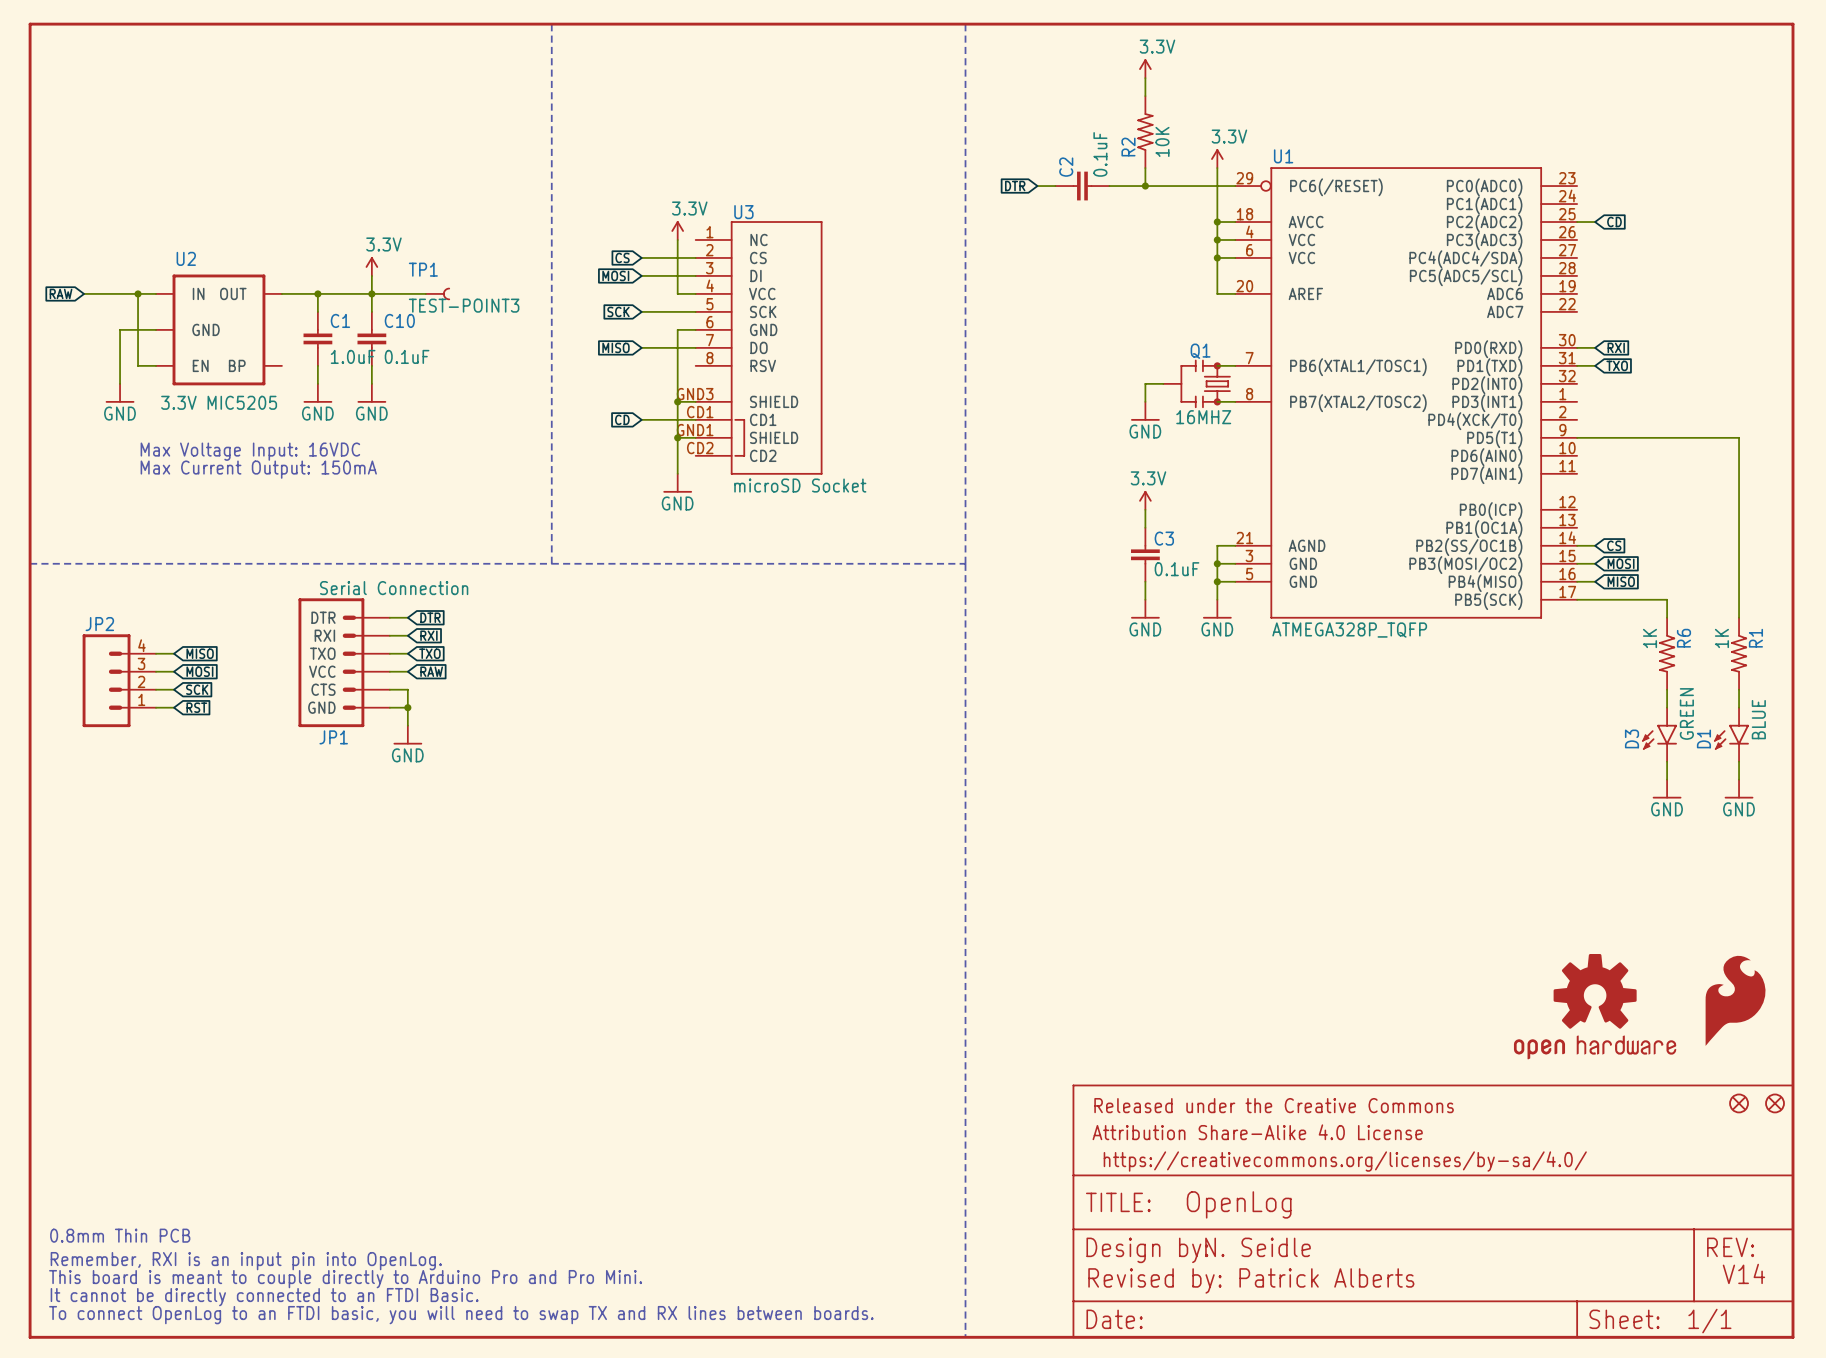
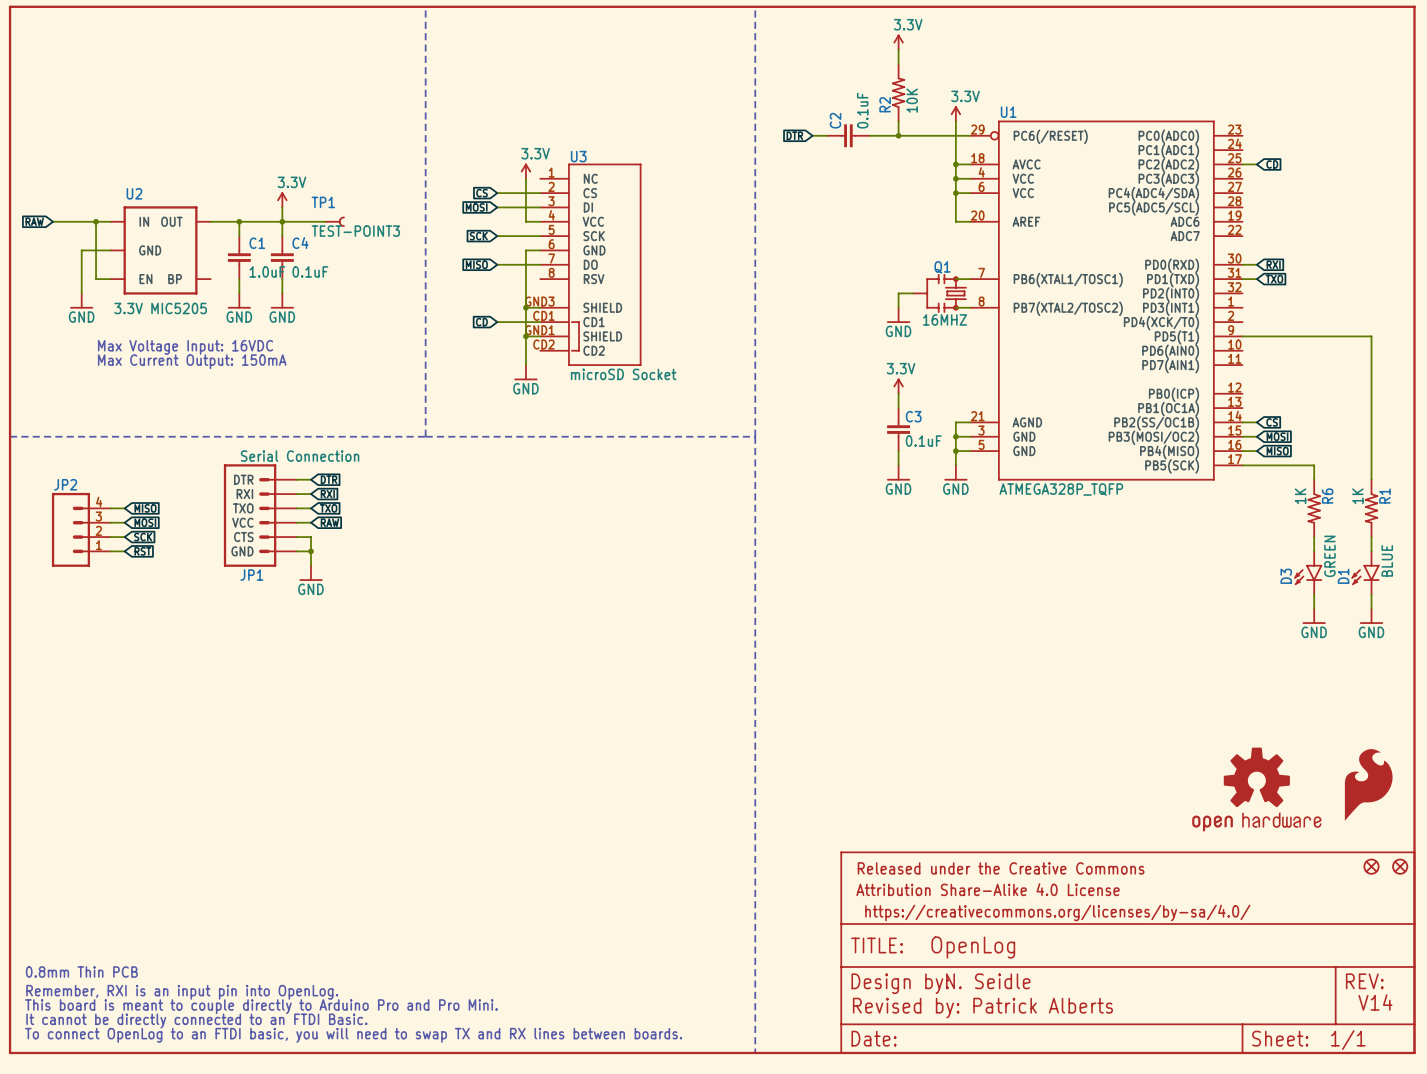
C10 name: C10 (399, 320) -> C4 (300, 243)

